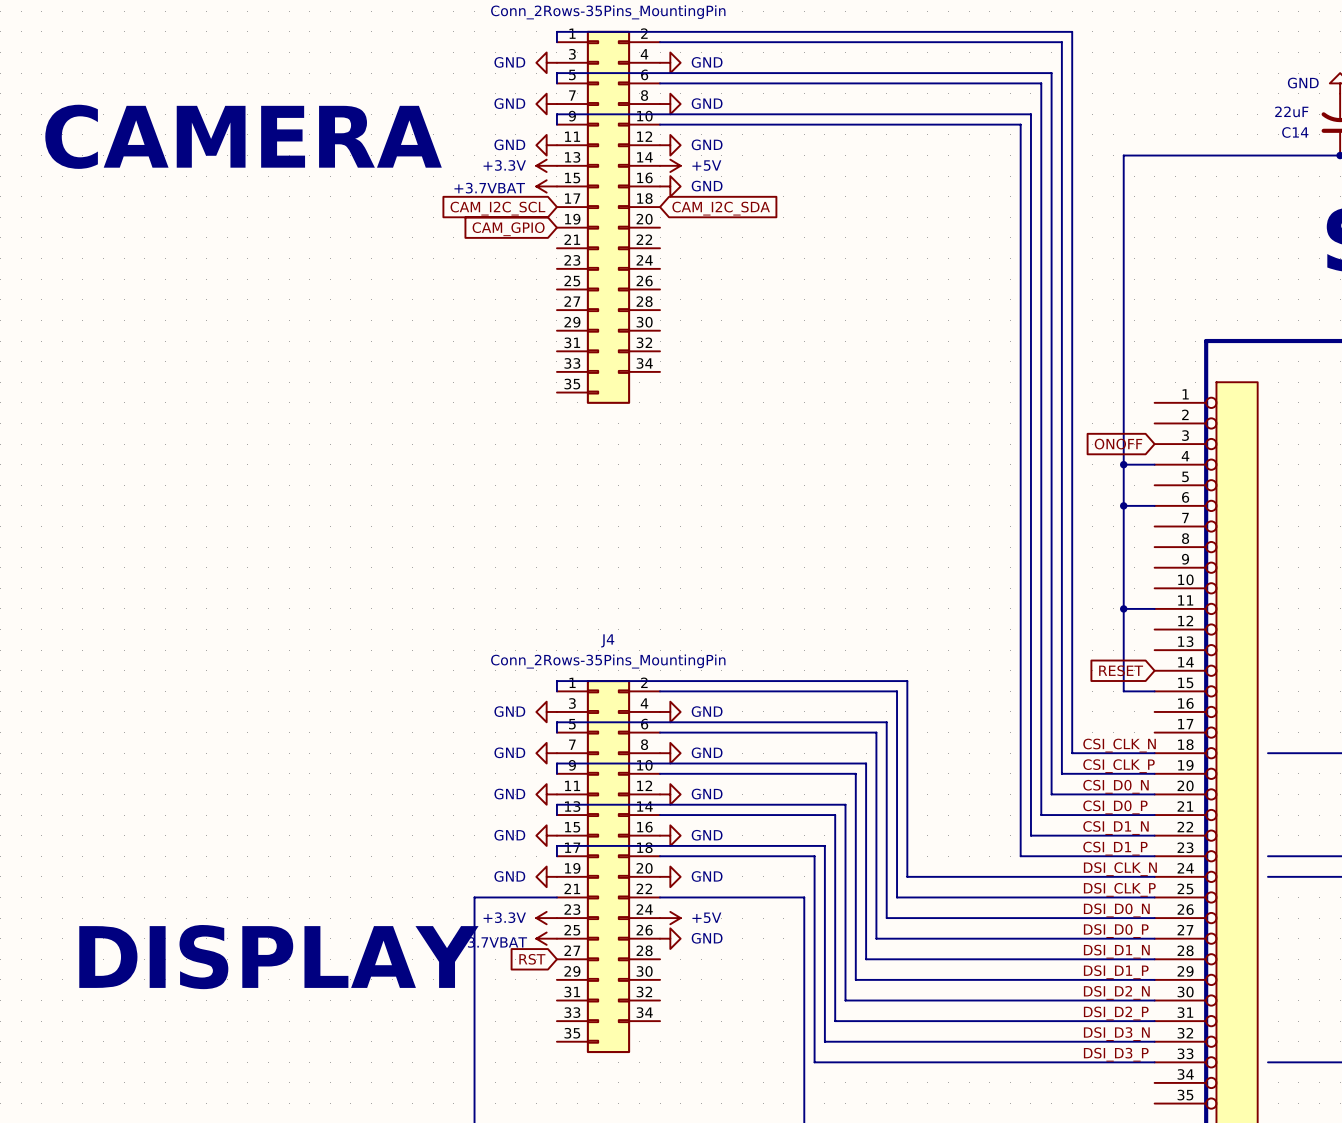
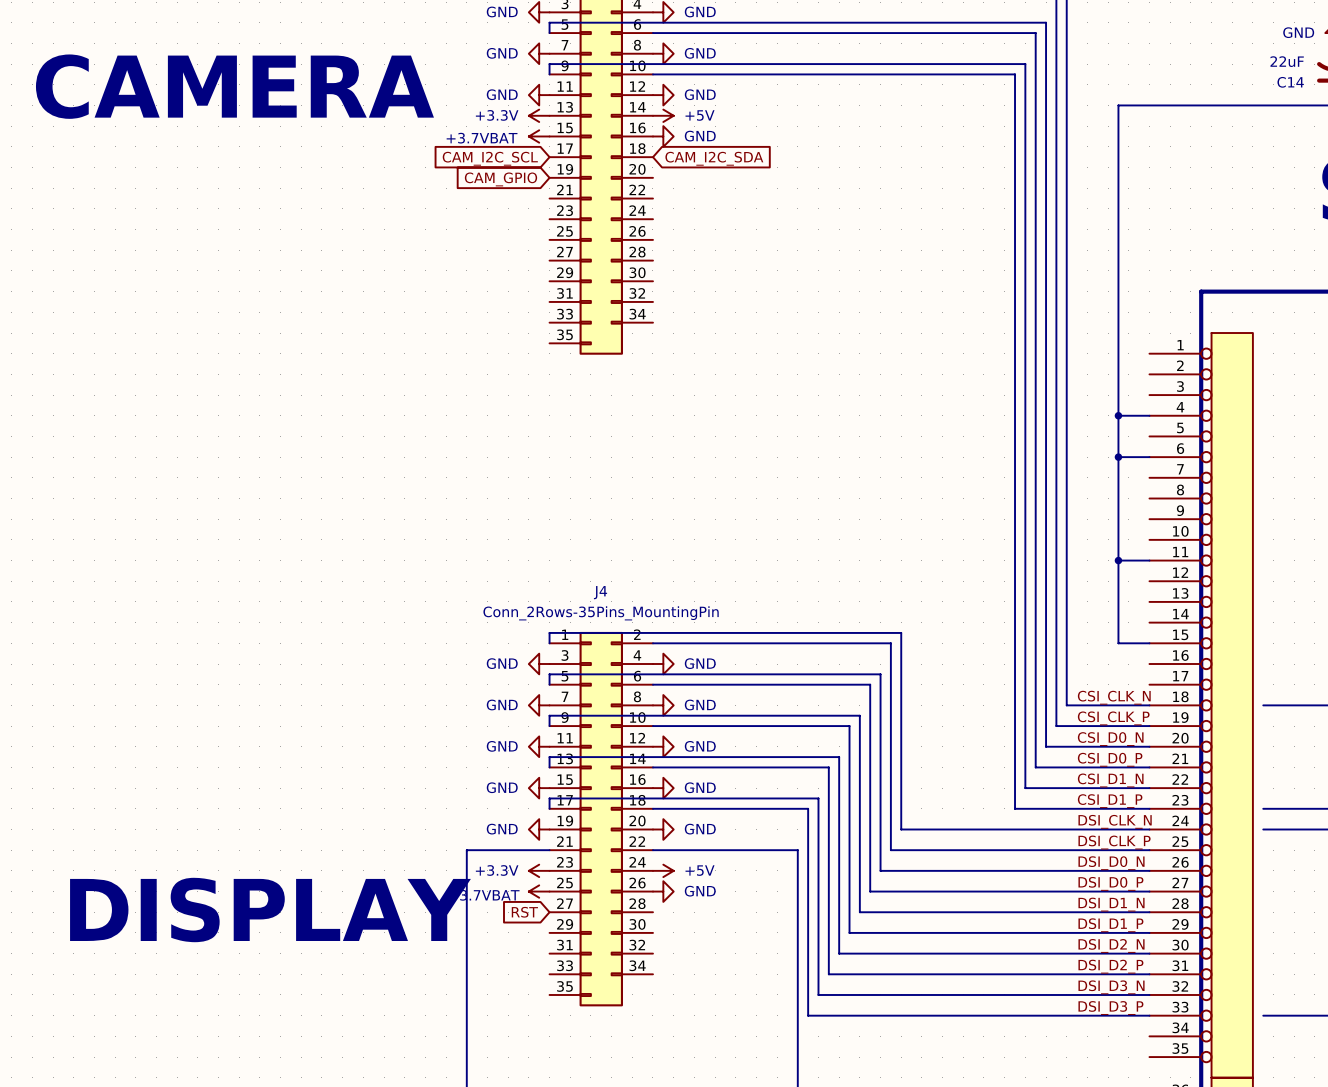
global label: ONOFF (1118, 444) -> none
global label: RESET (1121, 670) -> none

